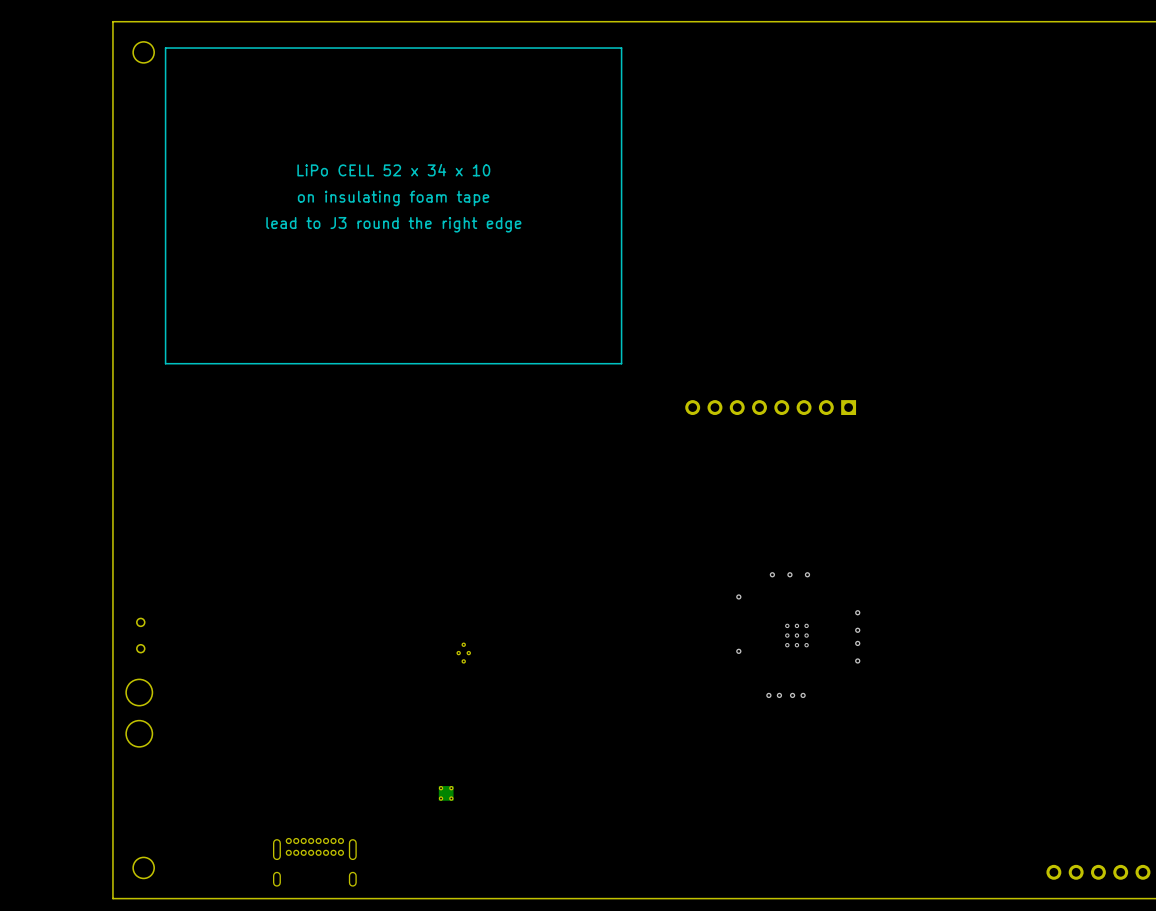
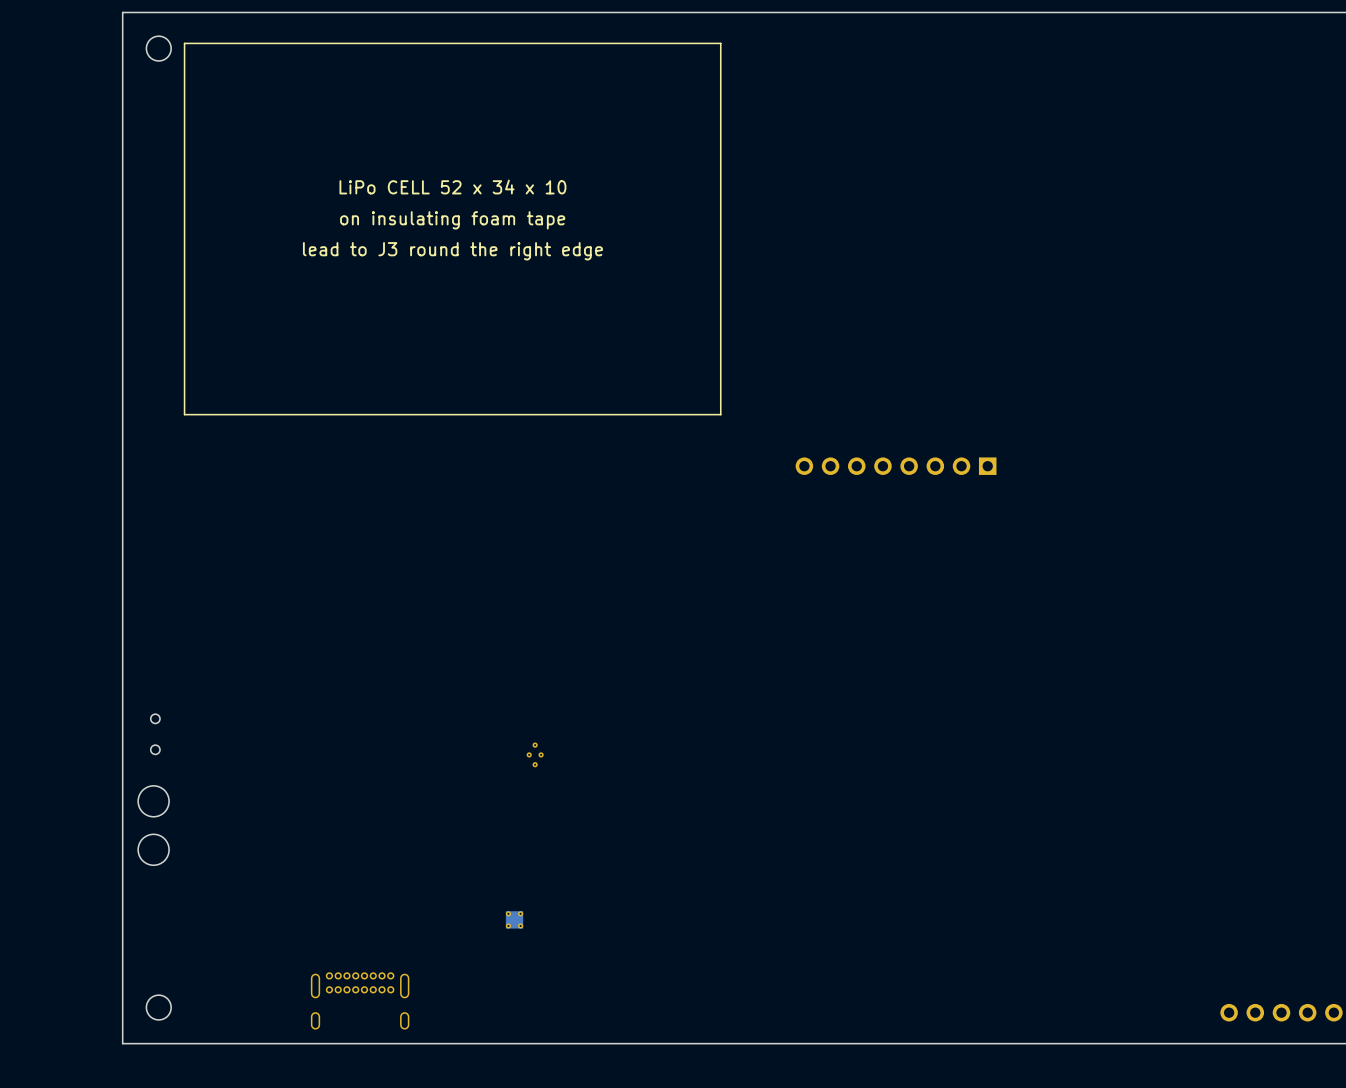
via: (772, 574) -> none
via: (789, 574) -> none
via: (807, 574) -> none
via: (738, 596) -> none
via: (857, 612) -> none
via: (787, 625) -> none
via: (796, 625) -> none
via: (806, 625) -> none
via: (857, 630) -> none
via: (787, 635) -> none
via: (796, 635) -> none
via: (806, 635) -> none
via: (857, 643) -> none
via: (787, 645) -> none
via: (796, 645) -> none
via: (806, 645) -> none
via: (738, 651) -> none
via: (857, 660) -> none
via: (768, 695) -> none
via: (779, 695) -> none
via: (792, 695) -> none
via: (803, 695) -> none

